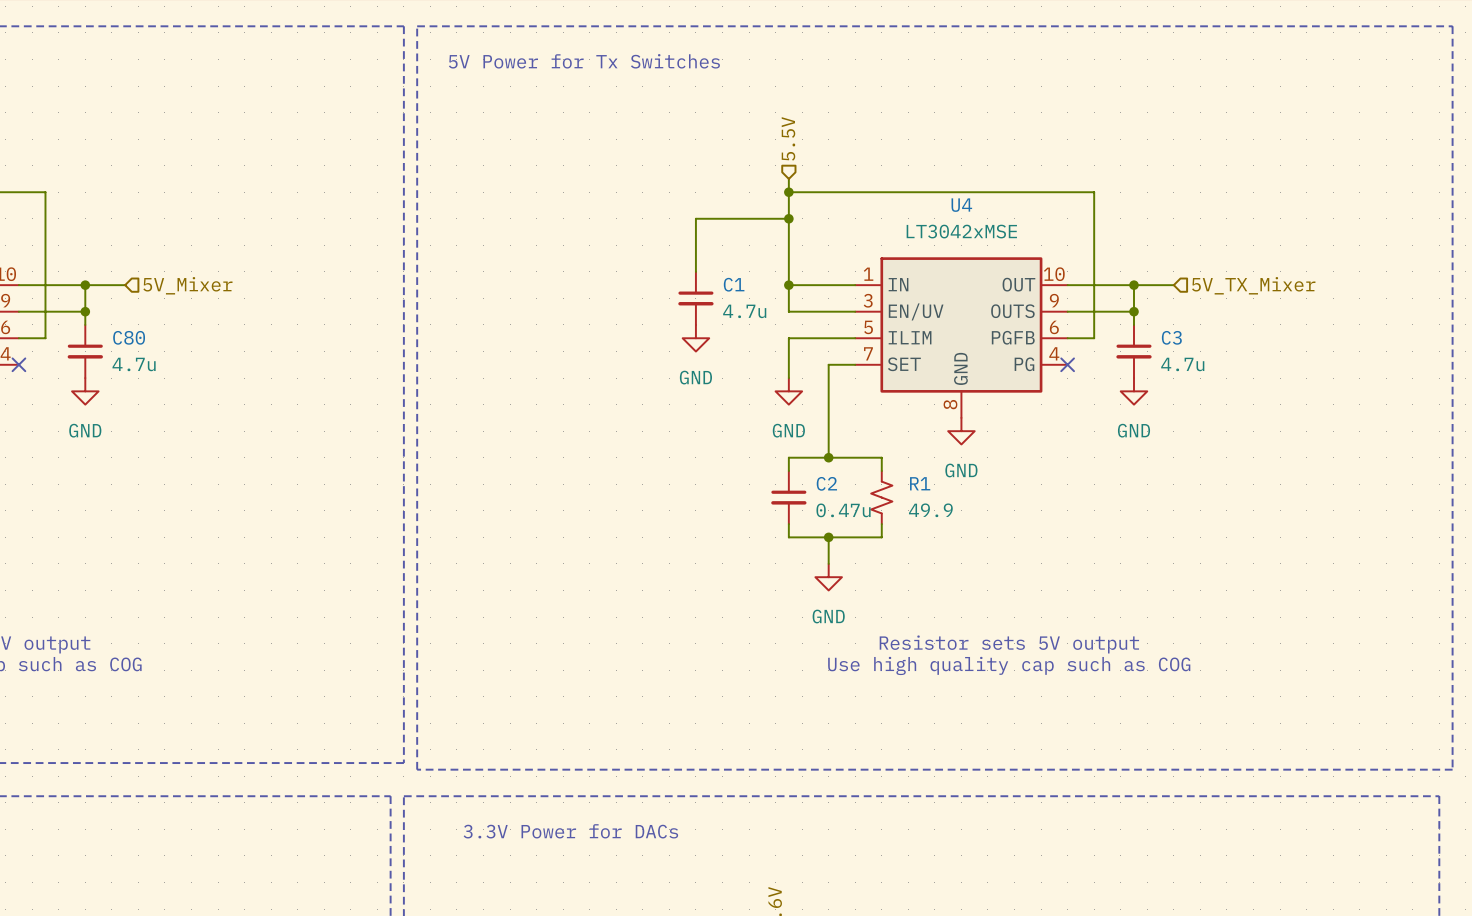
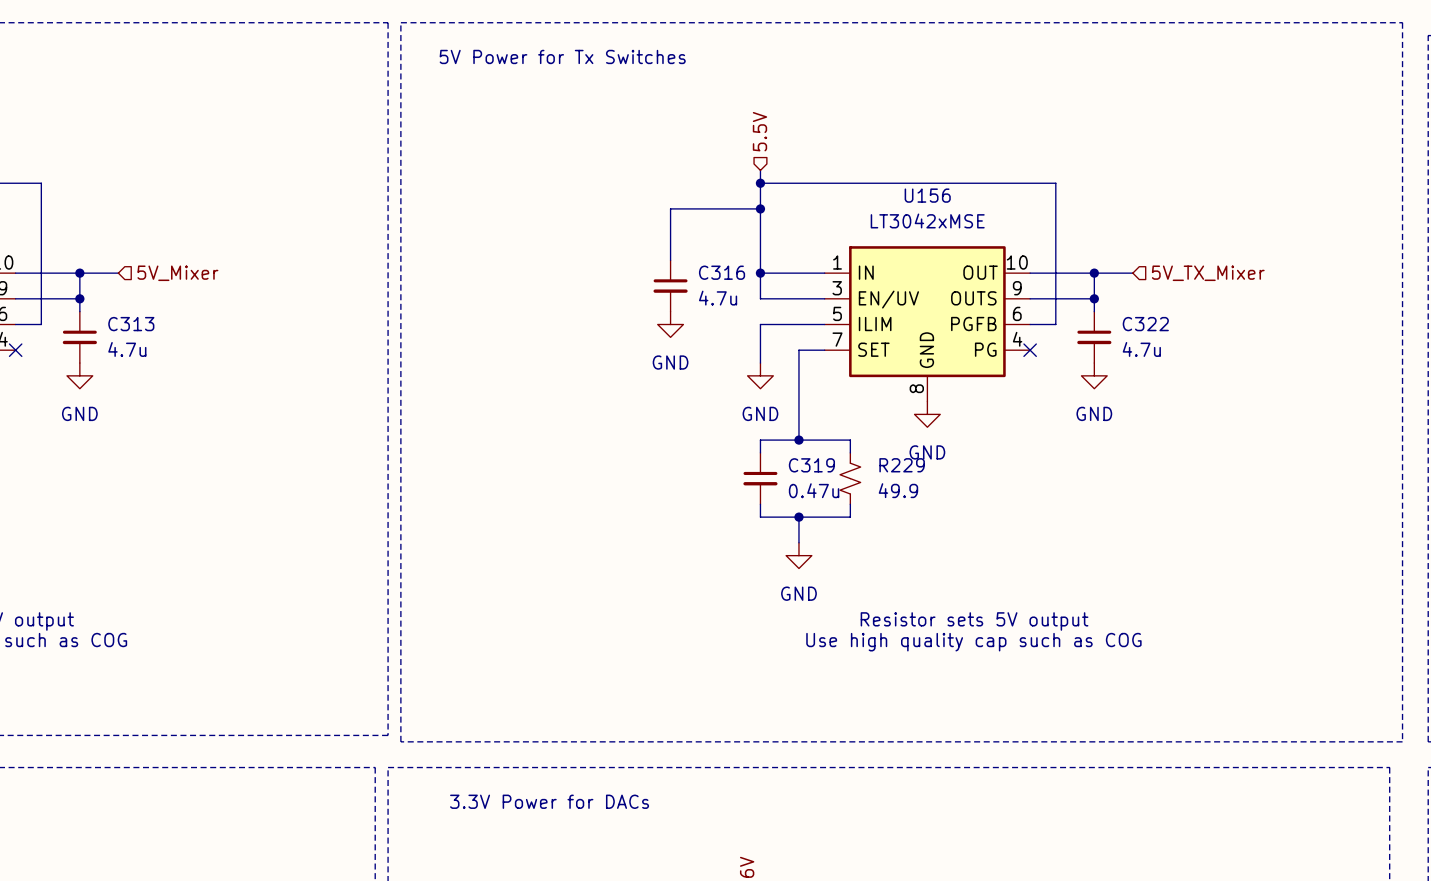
U4 name: U4 (961, 205) -> U156 (927, 195)
C1 name: C1 (734, 284) -> C316 (722, 272)
C80 name: C80 (129, 337) -> C313 (131, 324)
C3 name: C3 (1171, 337) -> C322 (1145, 324)
C2 name: C2 (826, 483) -> C319 (811, 465)
R1 name: R1 (920, 483) -> R229 (902, 465)

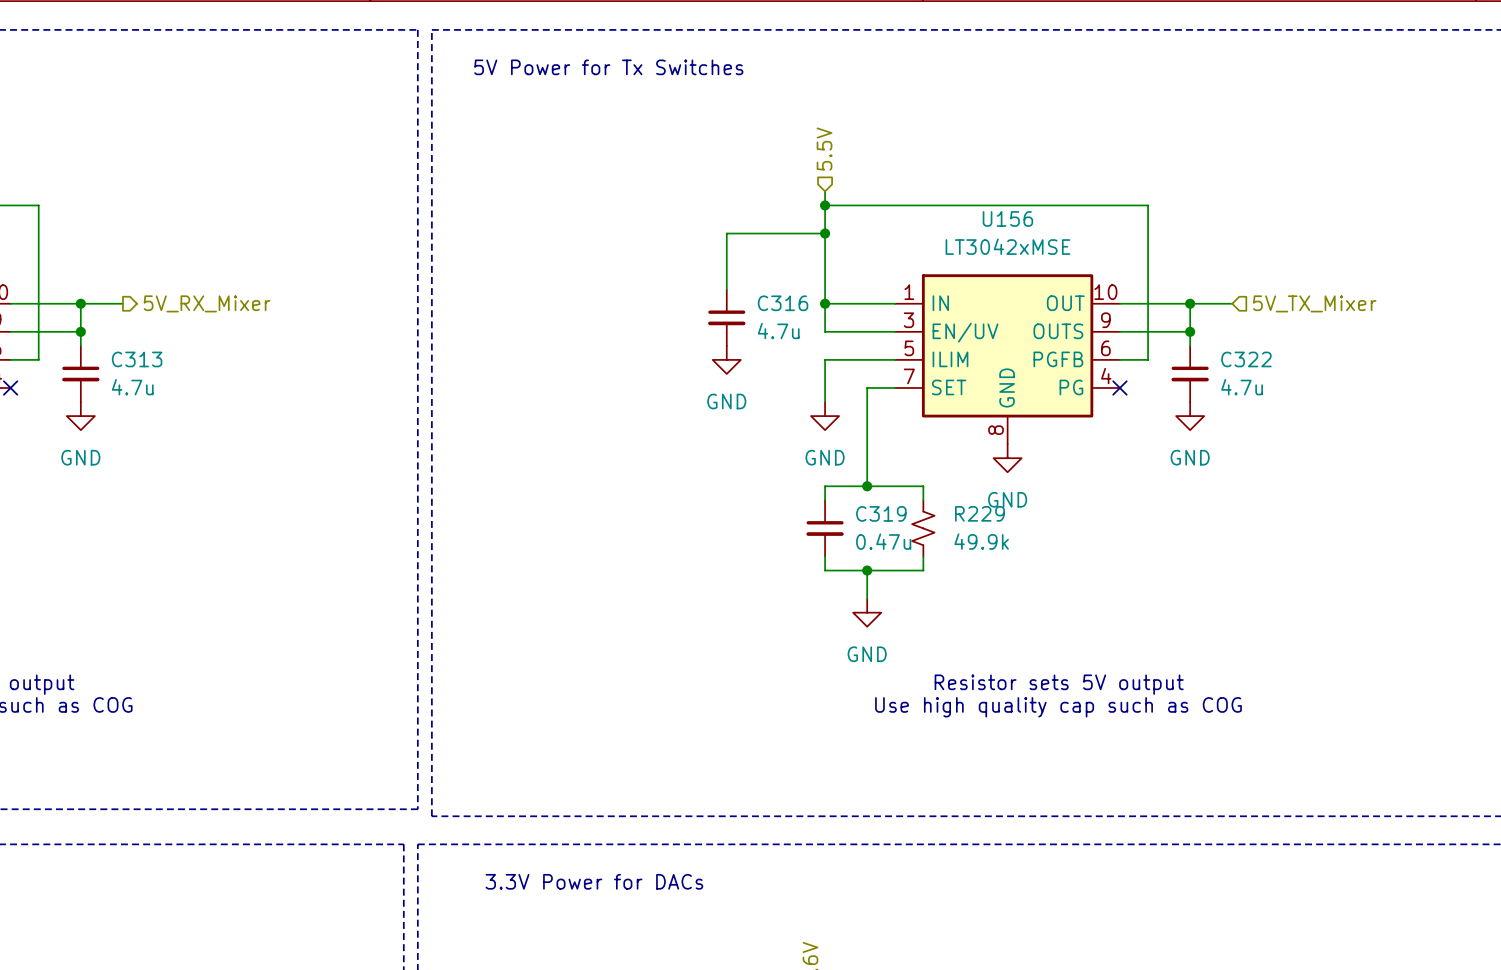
hierarchical label shape: input (177, 273) -> output (207, 303)
hierarchical label: 5V_Mixer (177, 273) -> 5V_RX_Mixer (207, 303)
R229 value: 49.9 (898, 490) -> 49.9k (981, 541)

